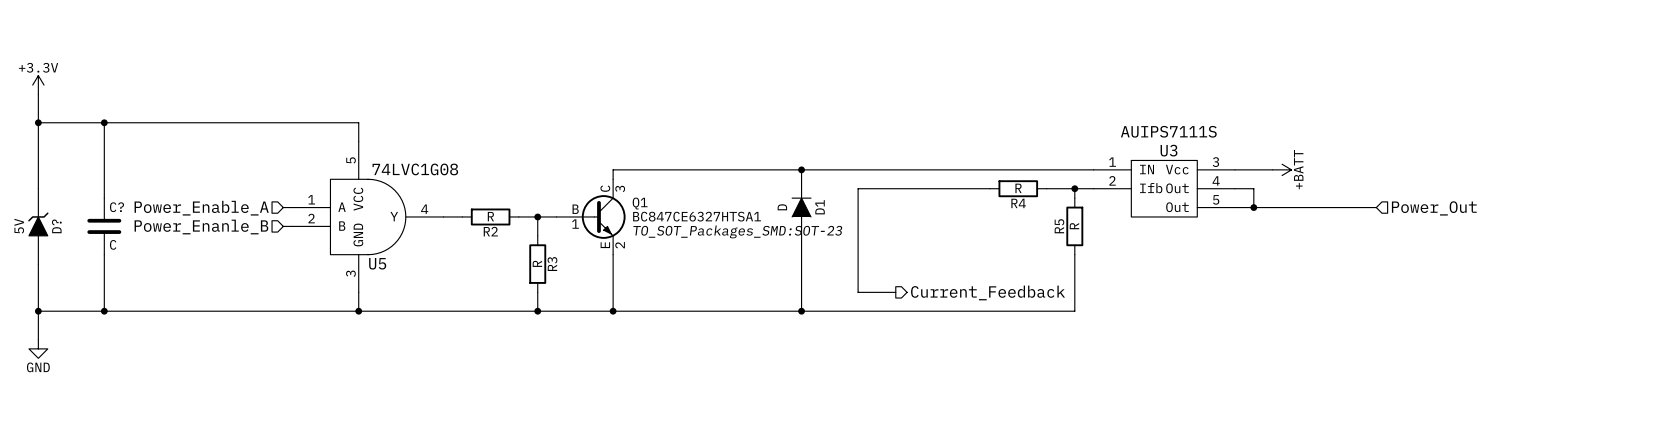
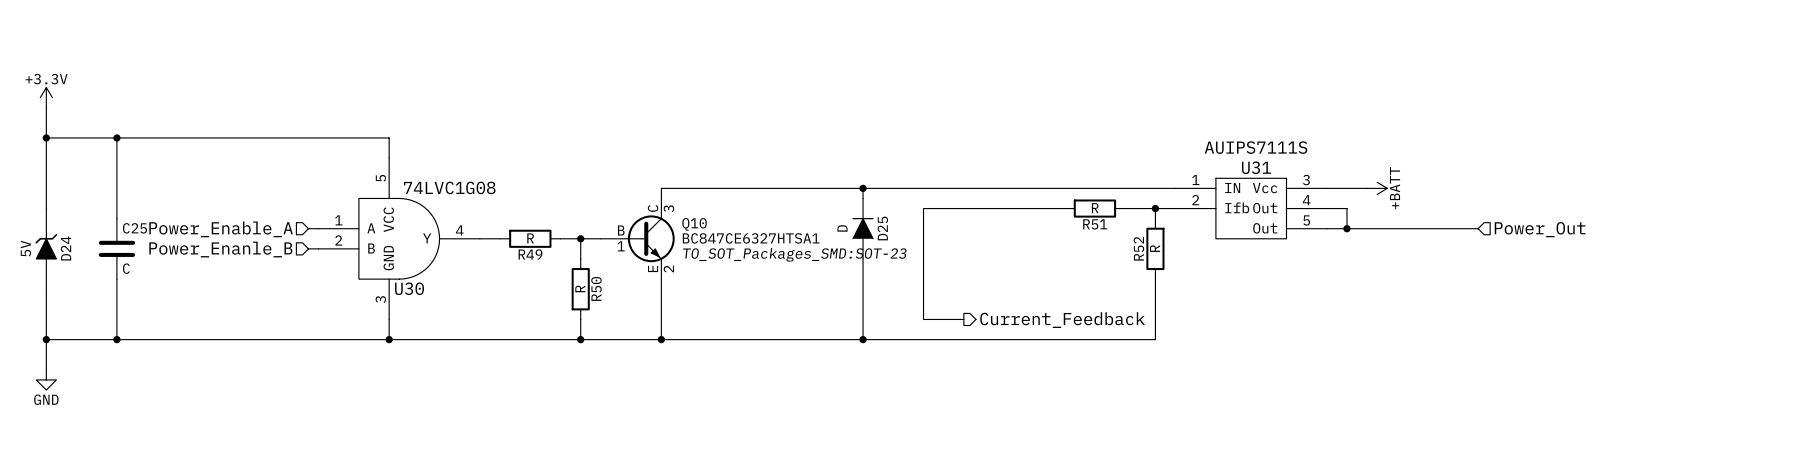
U3 name: U3 (1169, 150) -> U31 (1256, 167)
Q1 name: Q1 (640, 203) -> Q10 (694, 224)
R4 name: R4 (1018, 203) -> R51 (1095, 224)
C? name: C? (116, 207) -> C25 (134, 228)
D1 name: D1 (820, 207) -> D25 (882, 228)
D? name: D? (56, 226) -> D24 (66, 248)
R5 name: R5 (1059, 226) -> R52 (1138, 248)
R2 name: R2 (490, 231) -> R49 (530, 254)
U5 name: U5 (377, 263) -> U30 (409, 288)
R3 name: R3 (552, 264) -> R50 (596, 288)

